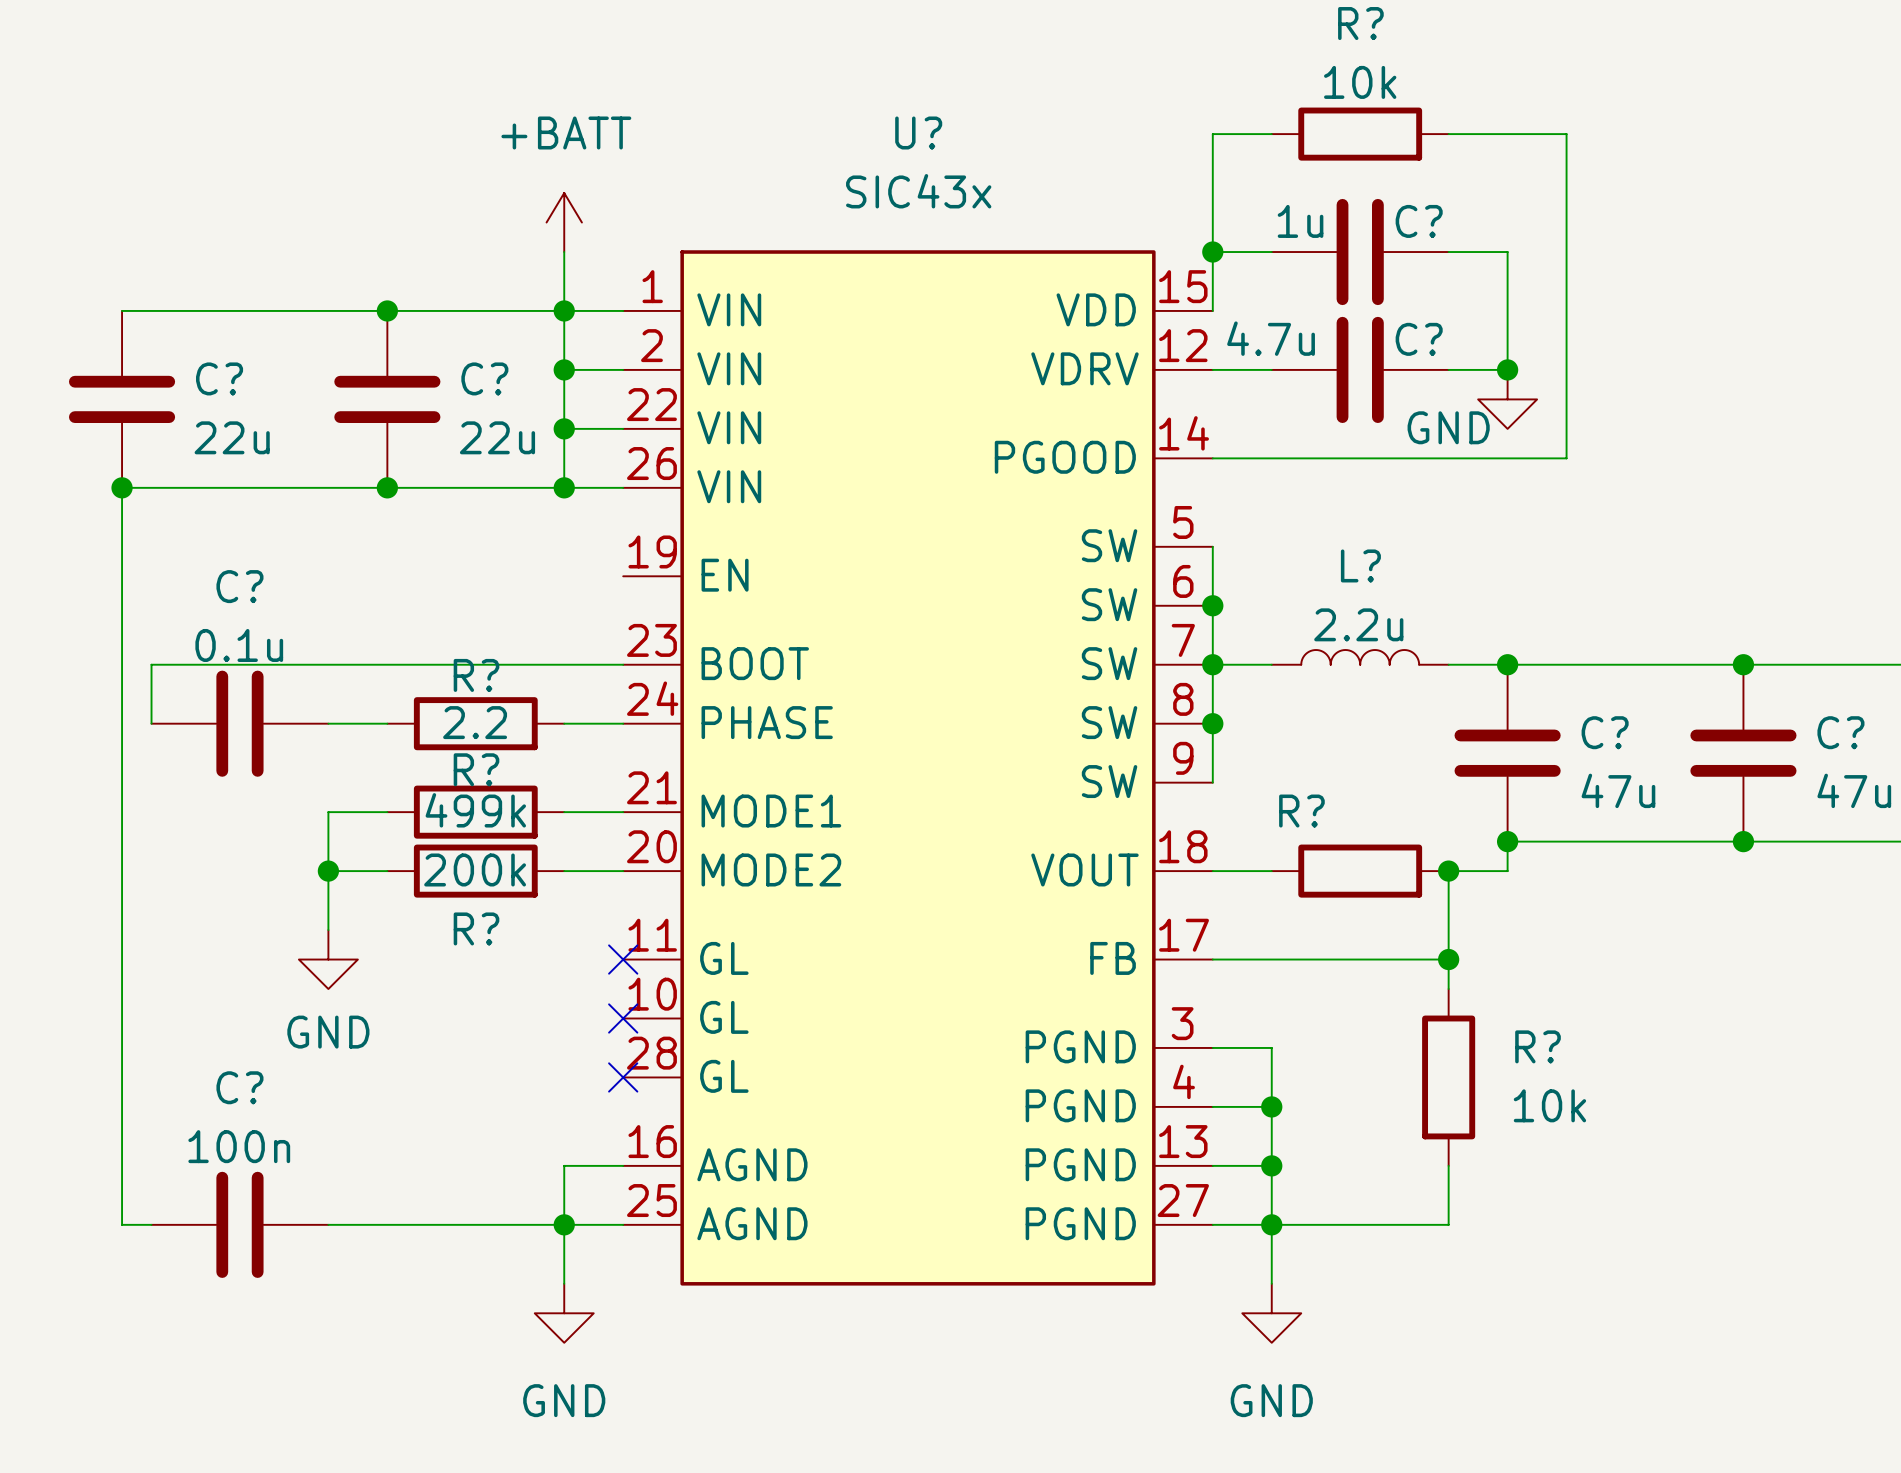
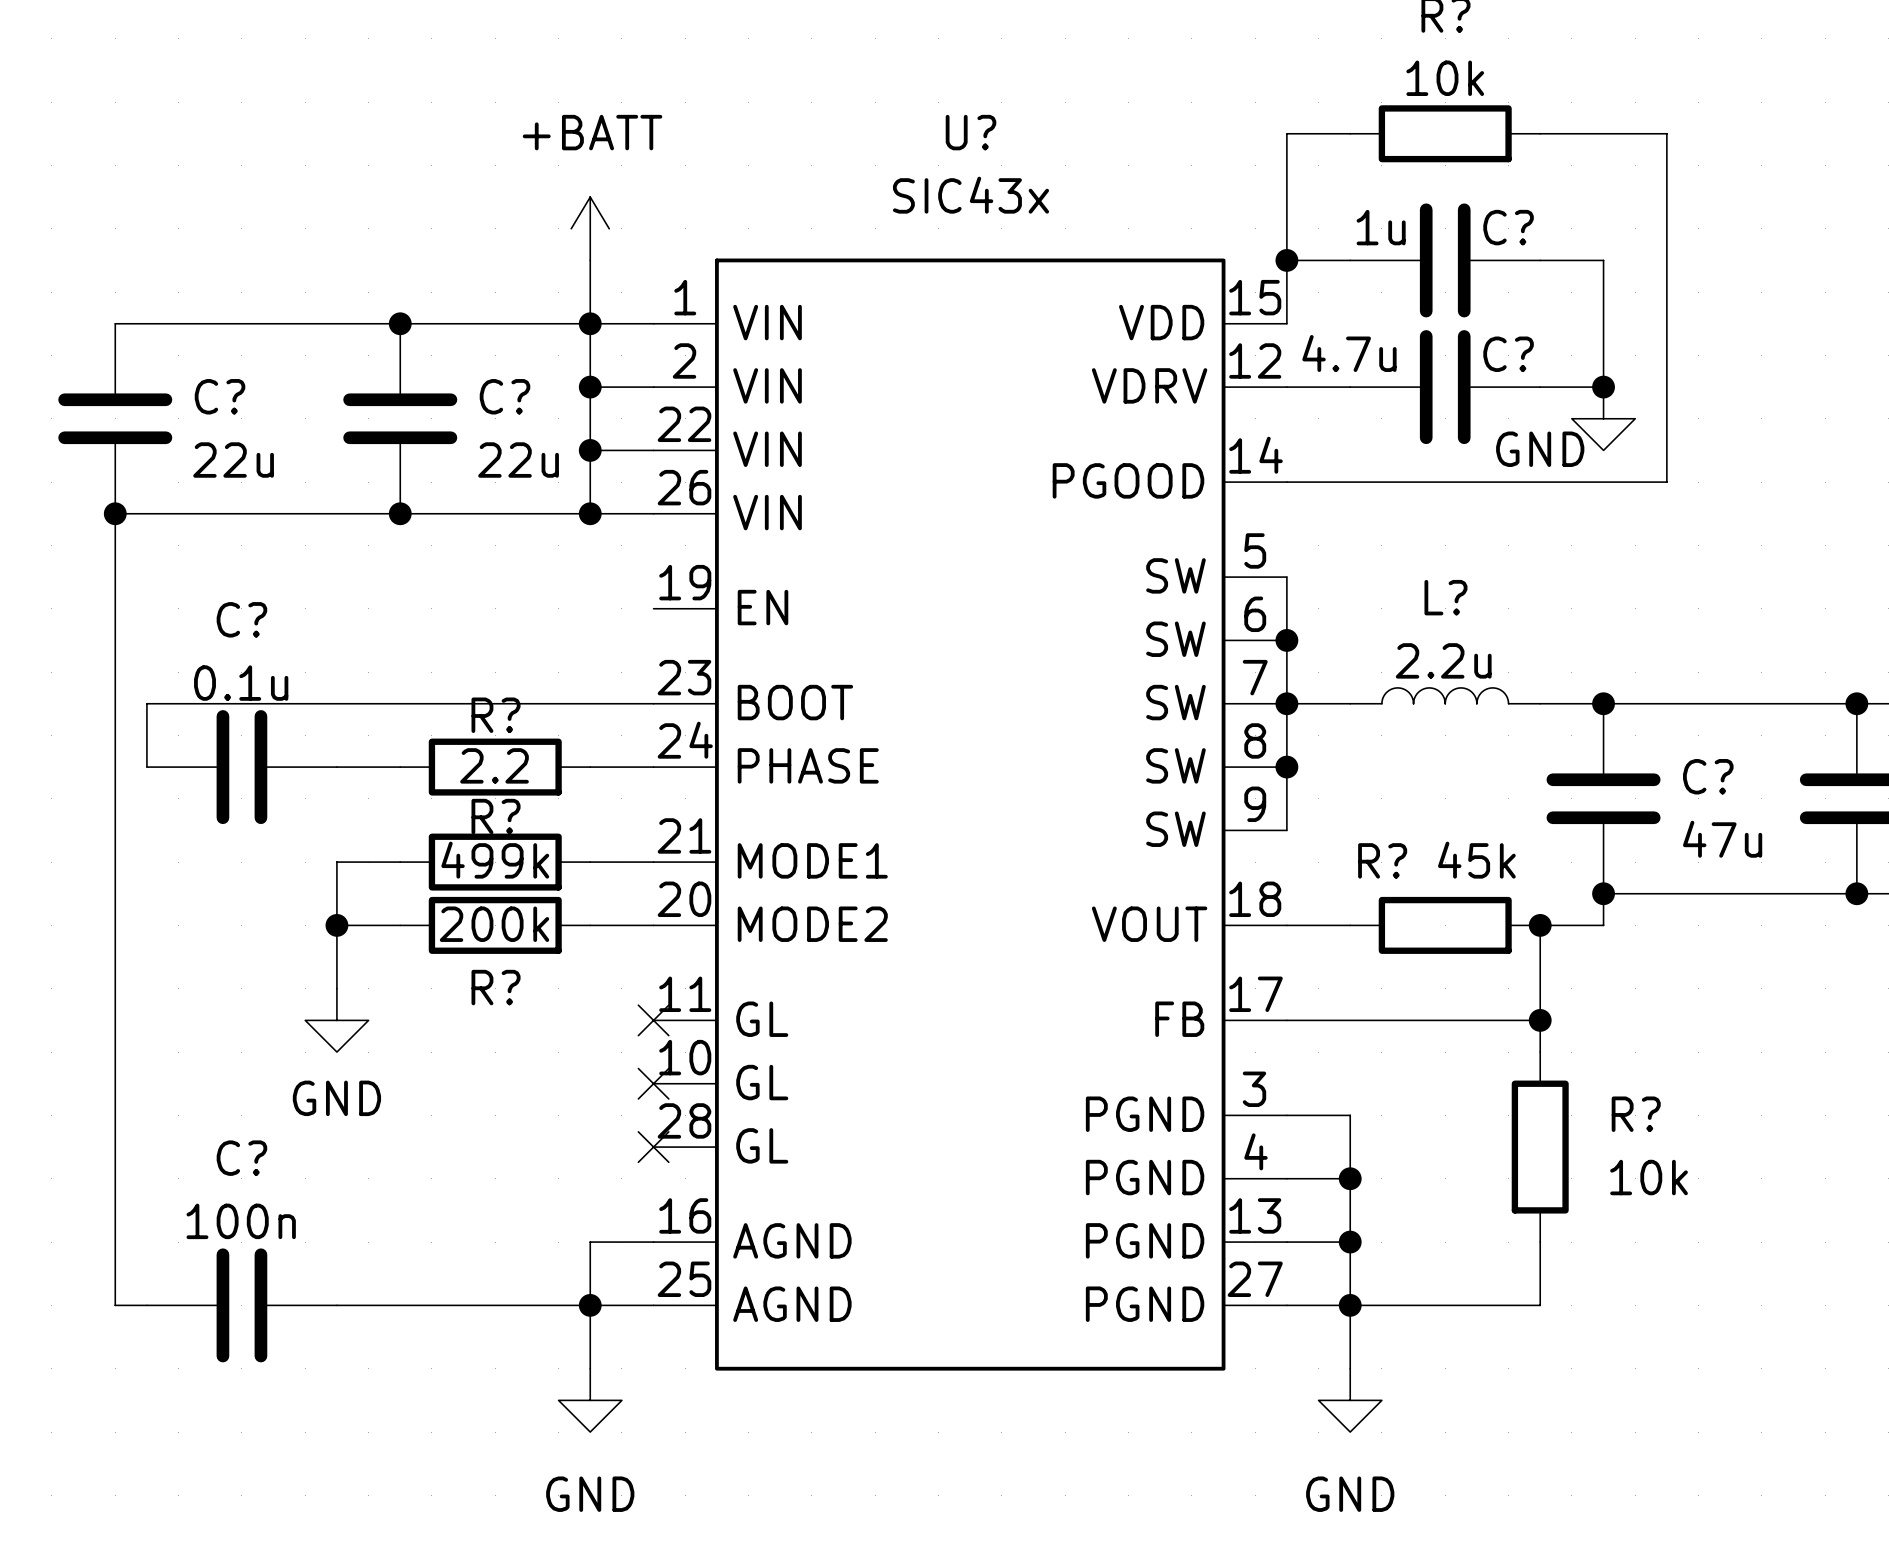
R? value: none -> 45k (1476, 860)

